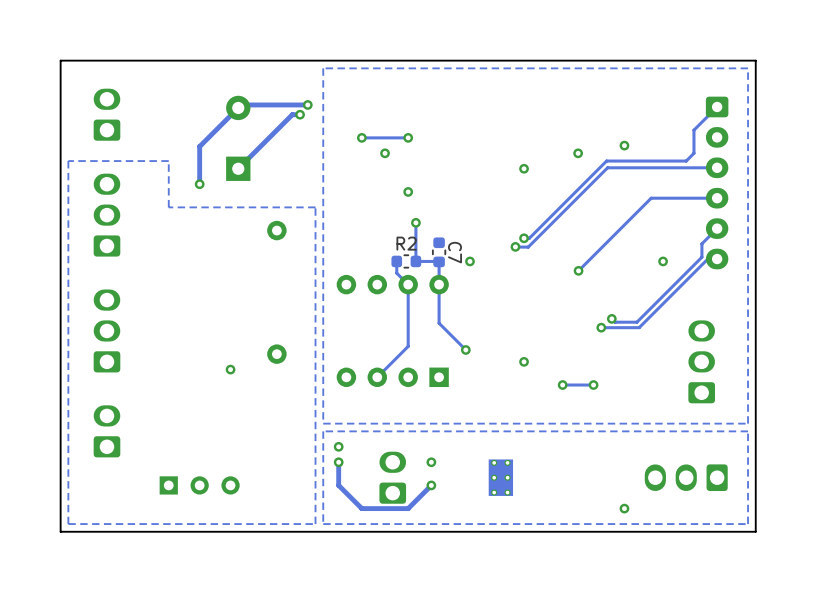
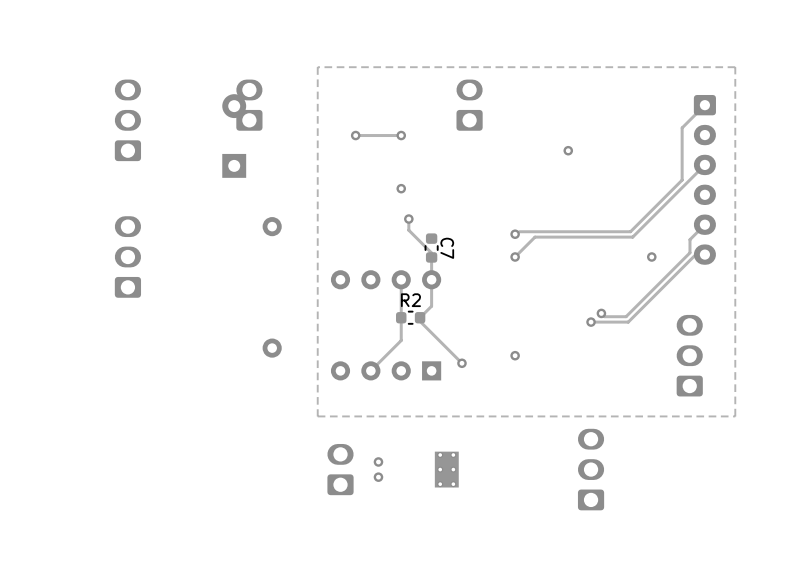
board edge: (755, 60) (755, 531) (60, 531) (60, 60) (755, 60) -> none
track: (307, 104) (241, 104) (199, 146) (199, 184) -> none
via: (307, 104) -> none
part: none -> (469, 105)
part position: (106, 114) -> (249, 105)
track: (300, 114) (292, 114) (238, 168) -> none
via: (300, 114) -> none
part: none -> (127, 120)
via: (624, 145) -> none
via: (385, 153) -> none
track: (693, 153) (686, 161) (606, 161) (529, 238) (524, 238) -> (682, 150) (682, 180) (630, 231) (519, 231)
zone outline: (168, 161) (168, 207) (315, 207) (315, 524) (68, 524) (68, 161) (168, 161) -> none
track: (717, 167) (607, 167) (528, 247) (515, 246) -> (704, 164) (632, 237) (535, 237) (515, 256)
via: (524, 168) -> none
via: (199, 184) -> none
track: (717, 198) (651, 198) (578, 270) -> none
part: (106, 215) -> none
track: (415, 234) (415, 261) (439, 261) -> (408, 230) (431, 253) (431, 257)
via position: (515, 246) -> (515, 256)
part: none -> (127, 256)
track: (396, 261) (396, 273) (408, 284) -> none
R2 position: (406, 261) -> (410, 317)
via: (469, 261) -> none
via: (578, 270) -> none
track: (439, 311) (439, 323) (465, 349) -> (431, 306) (420, 317) (420, 321) (461, 363)
part: (106, 330) -> none
via position: (465, 349) -> (461, 363)
via: (230, 369) -> none
via: (562, 385) -> none
track: (593, 385) (562, 385) -> none
via: (593, 385) -> none
part: (106, 431) -> none
zone outline: (748, 431) (748, 524) (323, 524) (323, 431) (748, 431) -> none
via: (338, 446) -> none
track: (338, 462) (338, 485) (361, 508) (408, 508) (431, 485) -> none
via: (338, 462) -> none
via: (431, 462) -> none
via: none -> (378, 461)
part position: (392, 477) -> (340, 469)
part position: (500, 477) -> (446, 469)
part rotation: 0° (686, 477) -> 90° clockwise (591, 469)
part position: (686, 477) -> (591, 469)
part: (199, 485) -> none
via: none -> (378, 477)
via: (431, 485) -> none
via: (624, 508) -> none

